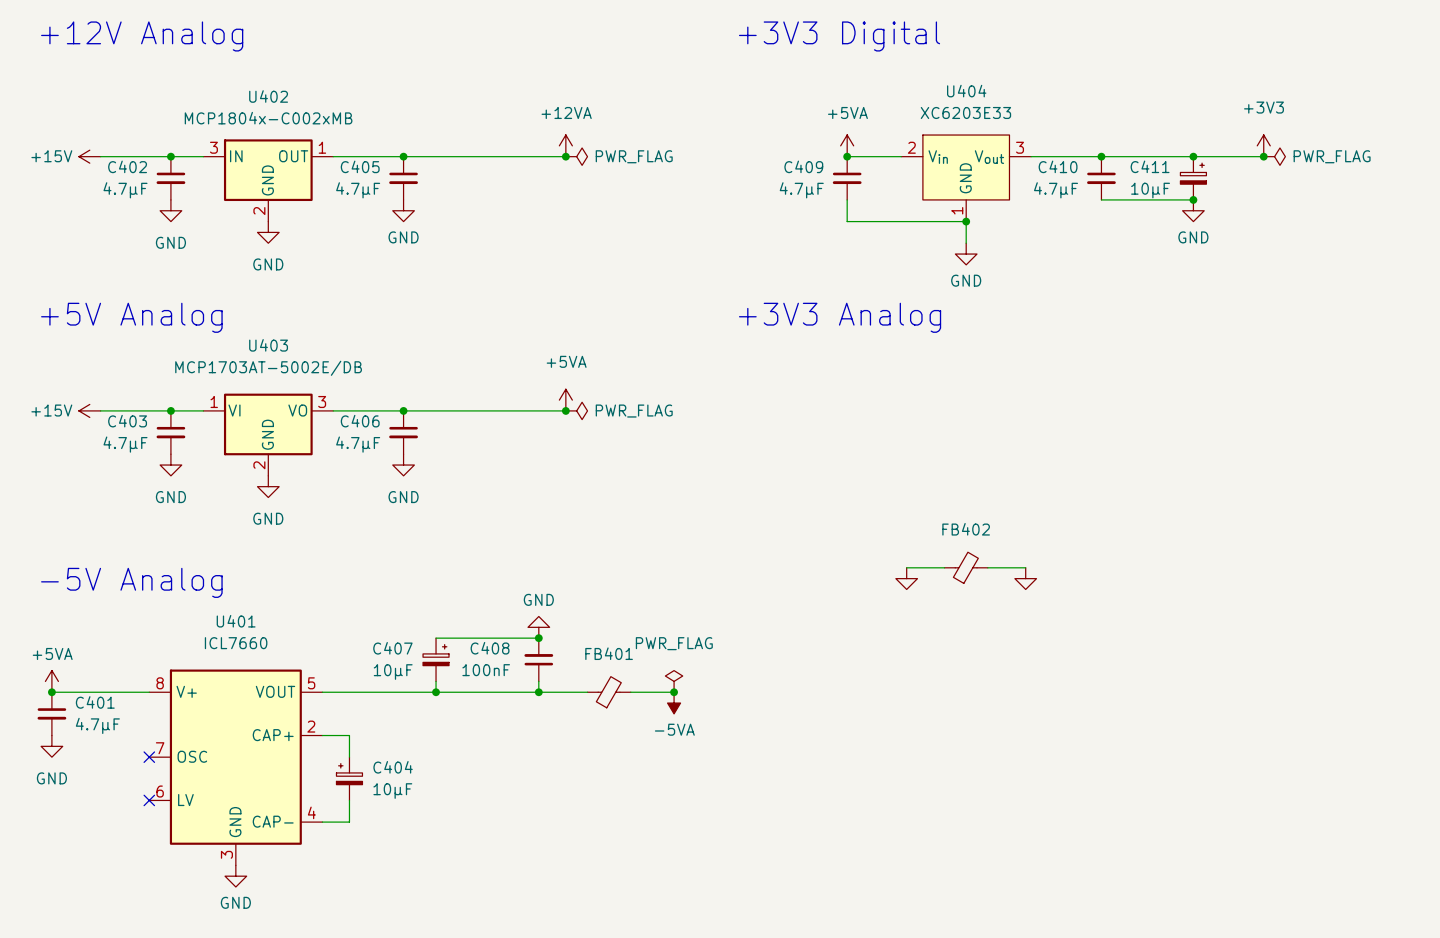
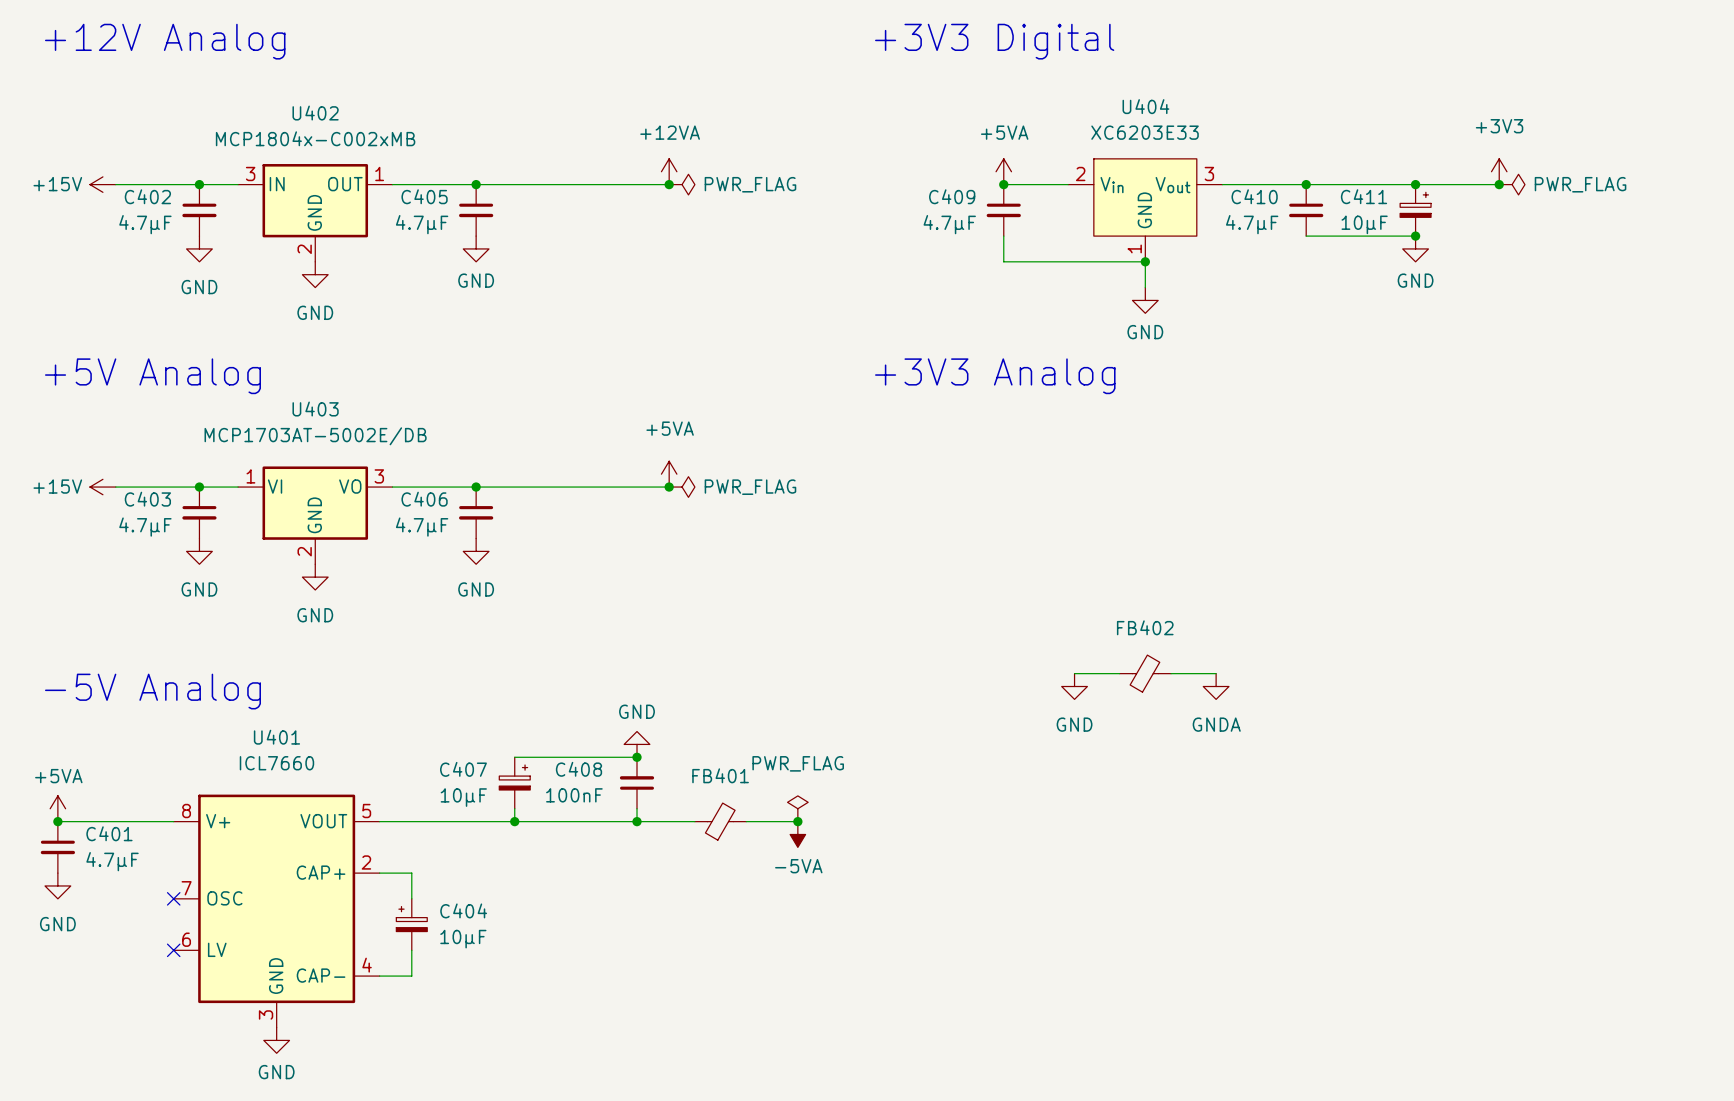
power symbol text: none -> GND (1074, 724)
power symbol text: none -> GNDA (1216, 724)

